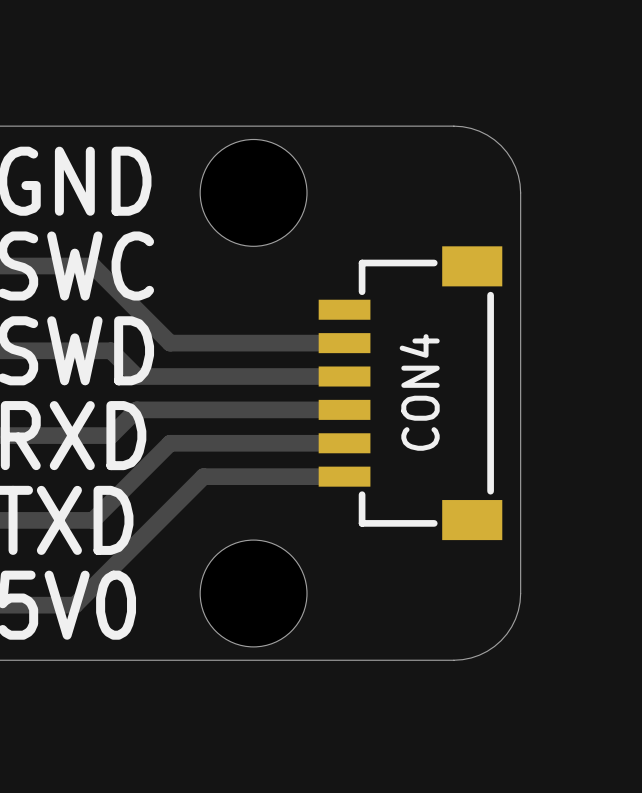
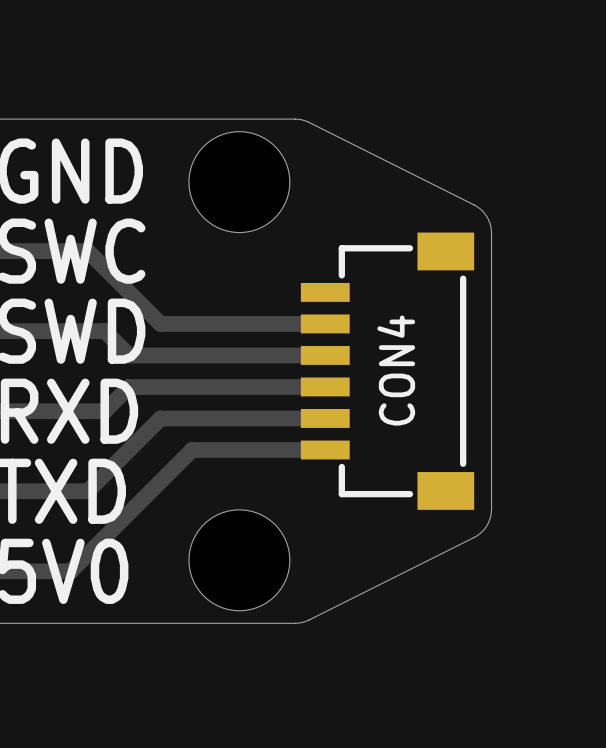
board edge: (312, 126) (453, 126) (471, 128) (487, 135) (506, 152) (518, 175) (520, 192) (520, 246) -> (294, 119) (309, 122) (477, 206) (486, 216) (491, 233)
board edge: (520, 539) (520, 593) (518, 610) (506, 634) (487, 651) (471, 657) (453, 660) (312, 660) -> (491, 509) (486, 525) (477, 535) (309, 620) (294, 623)

